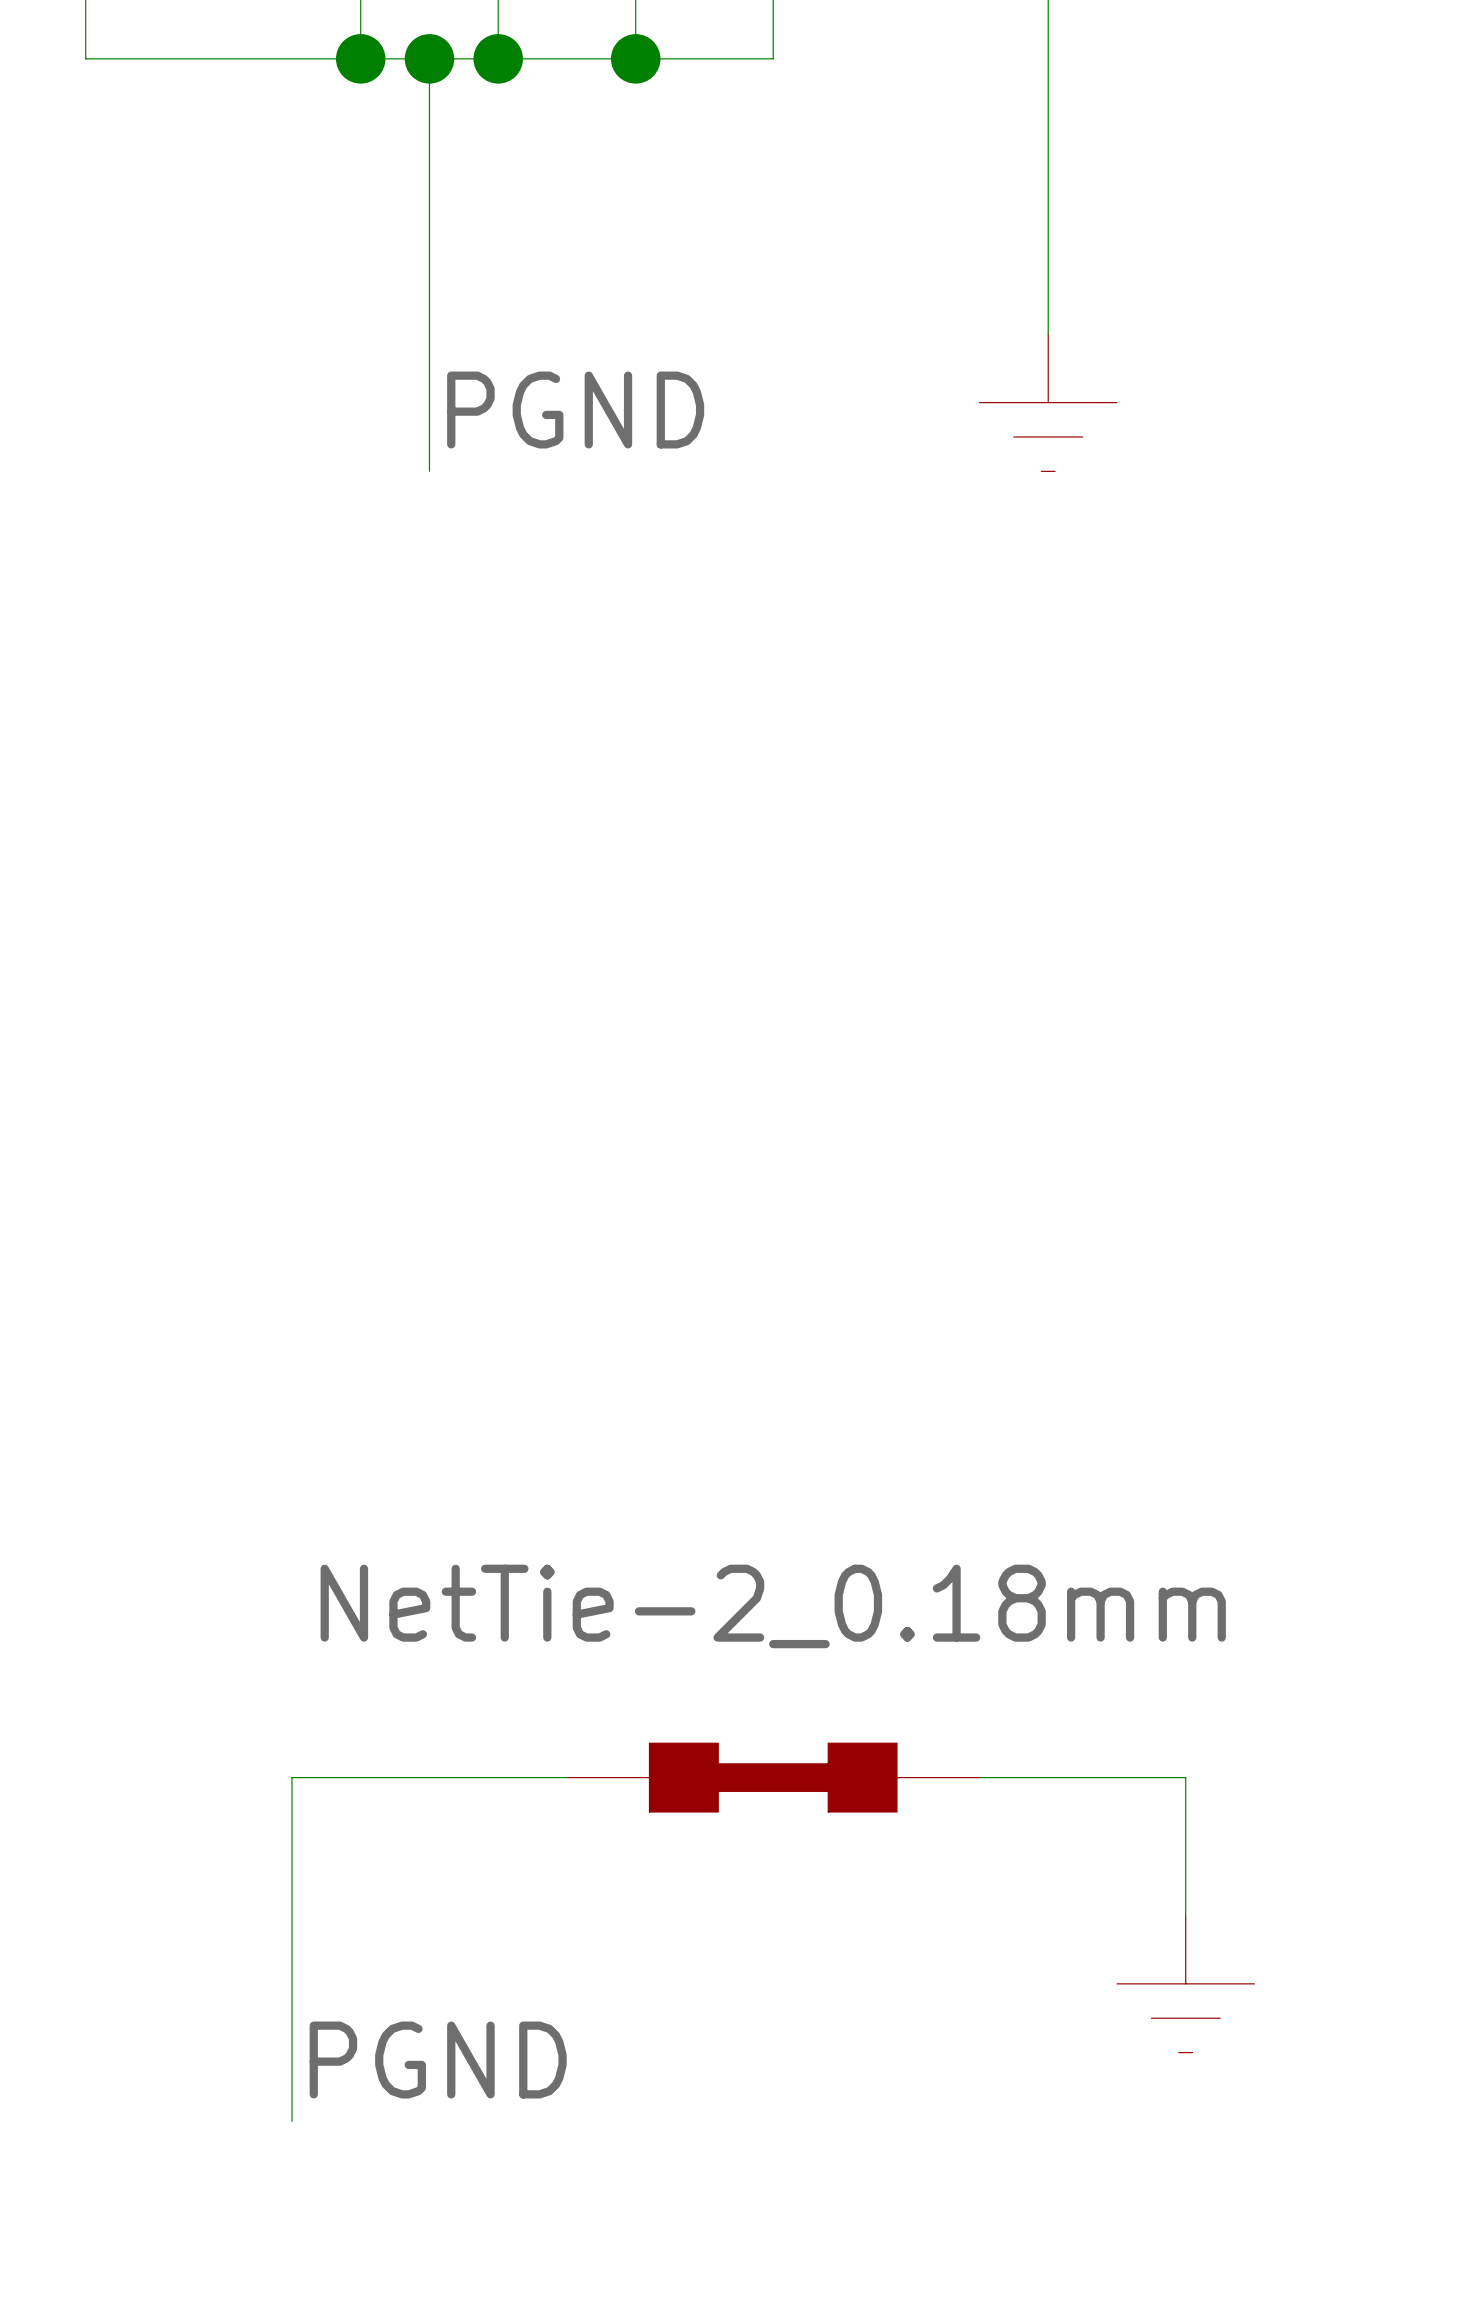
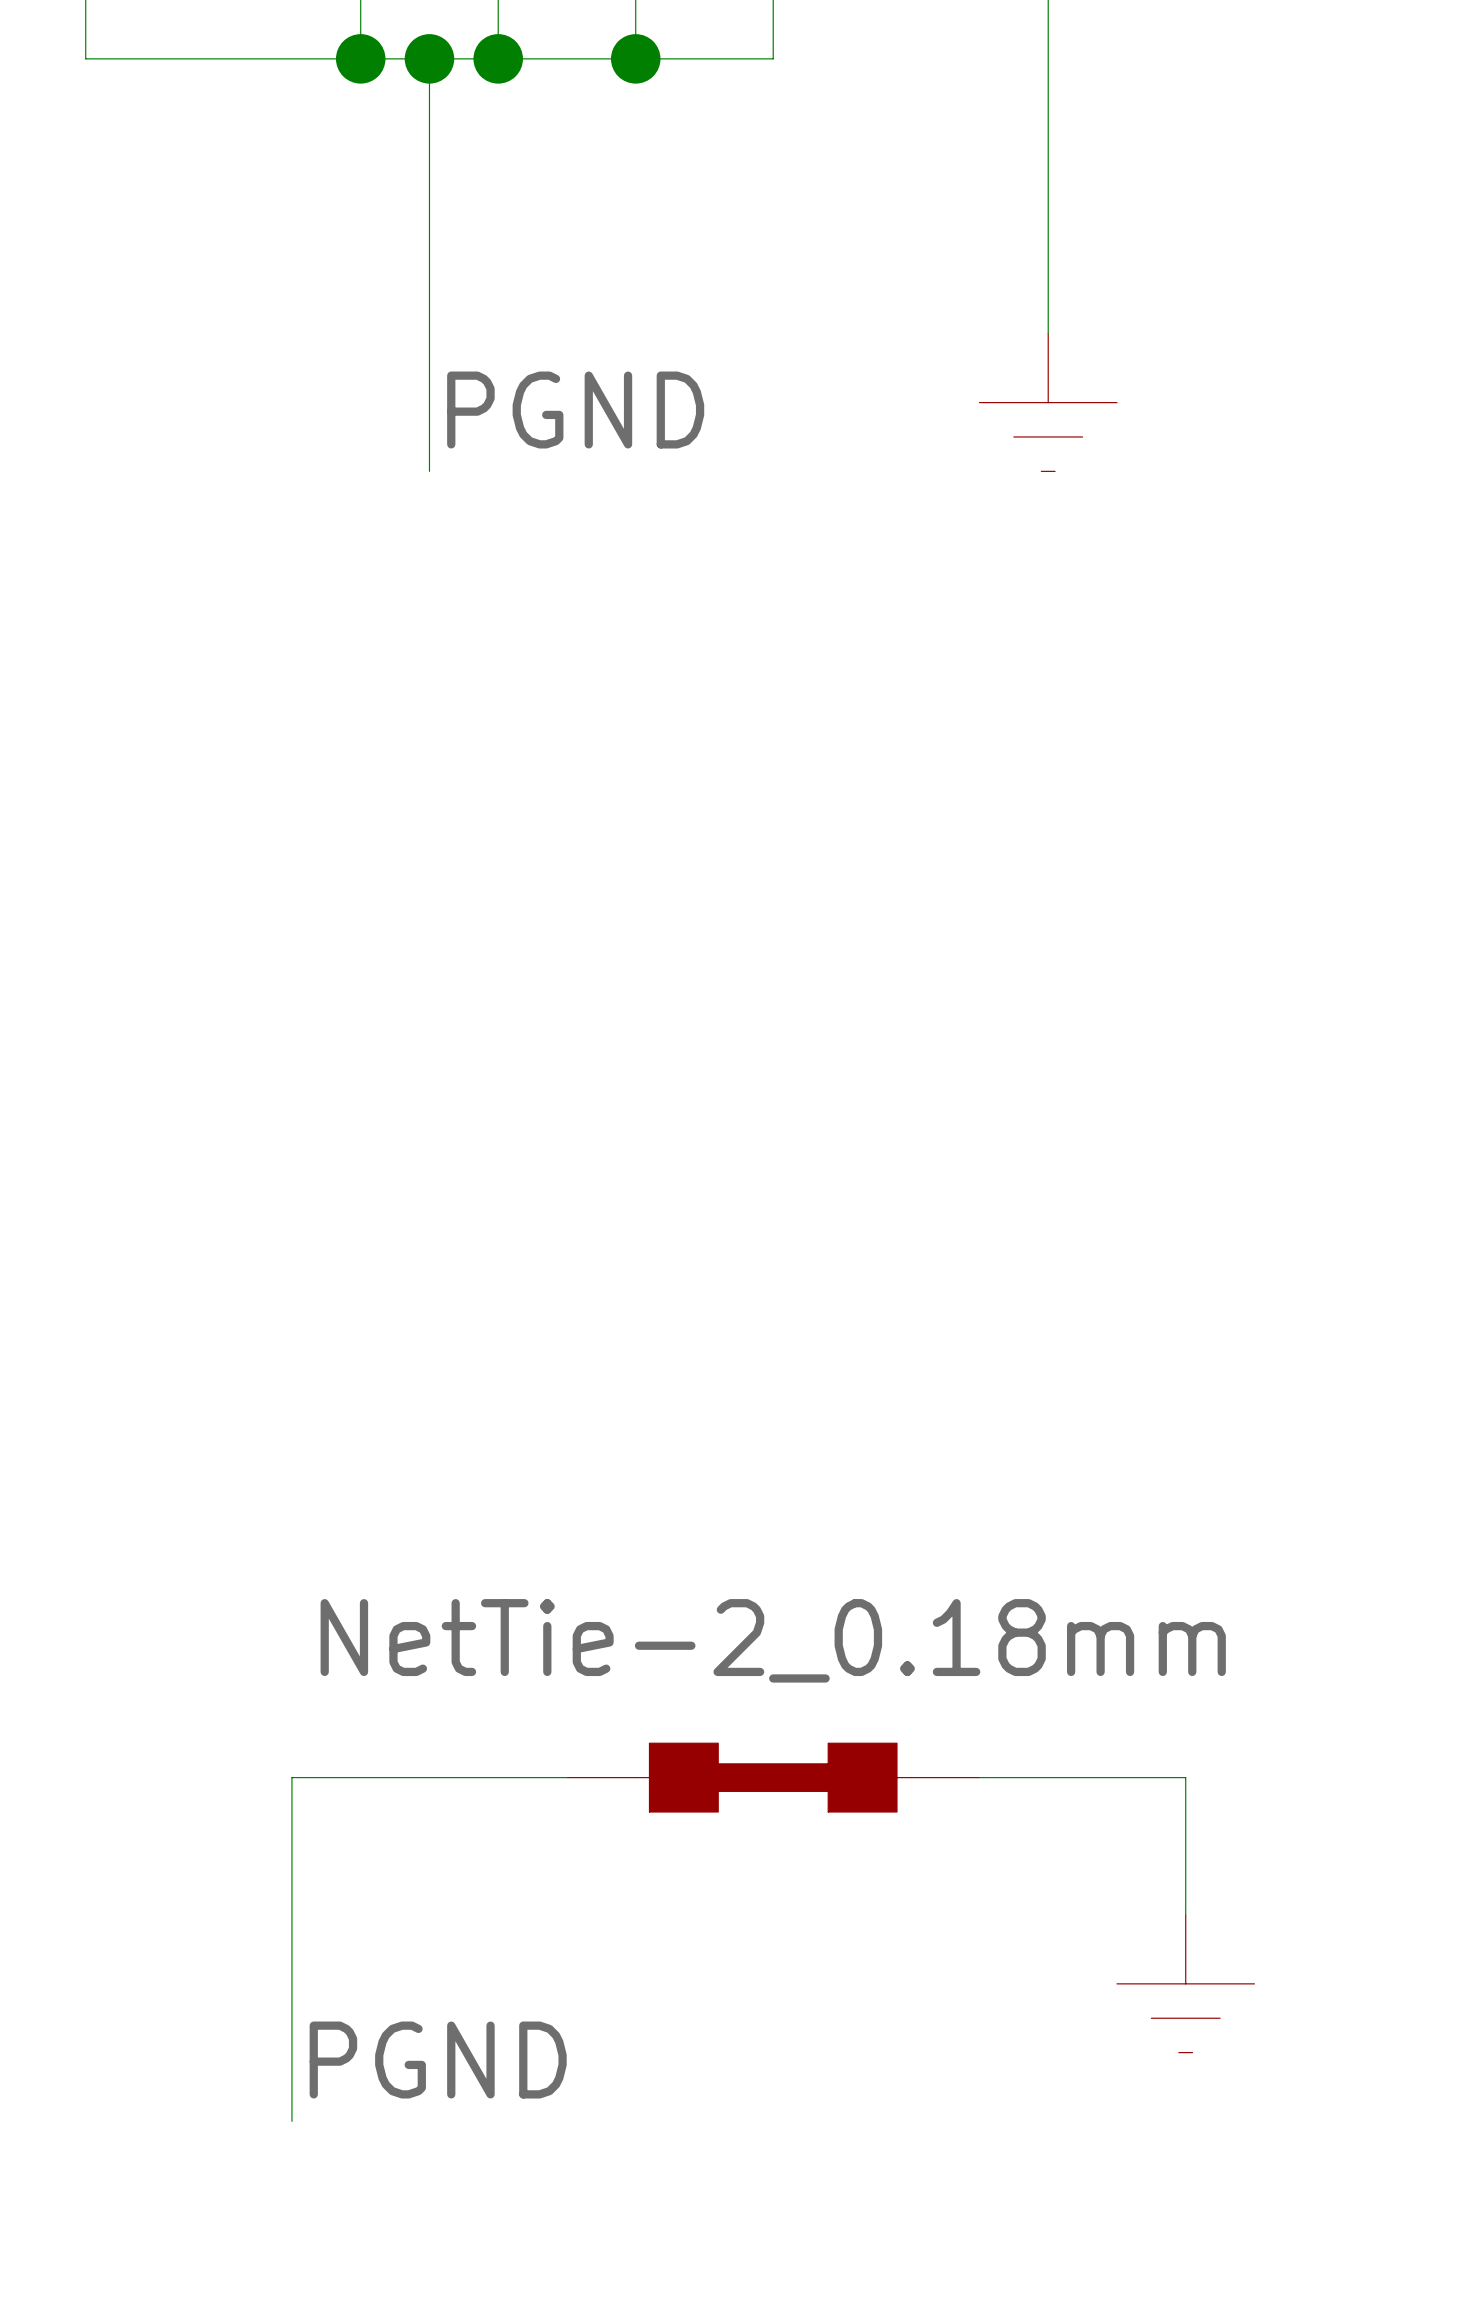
part value position: NetTie-2_0.18mm (773, 1606) -> NetTie-2_0.18mm (773, 1640)

